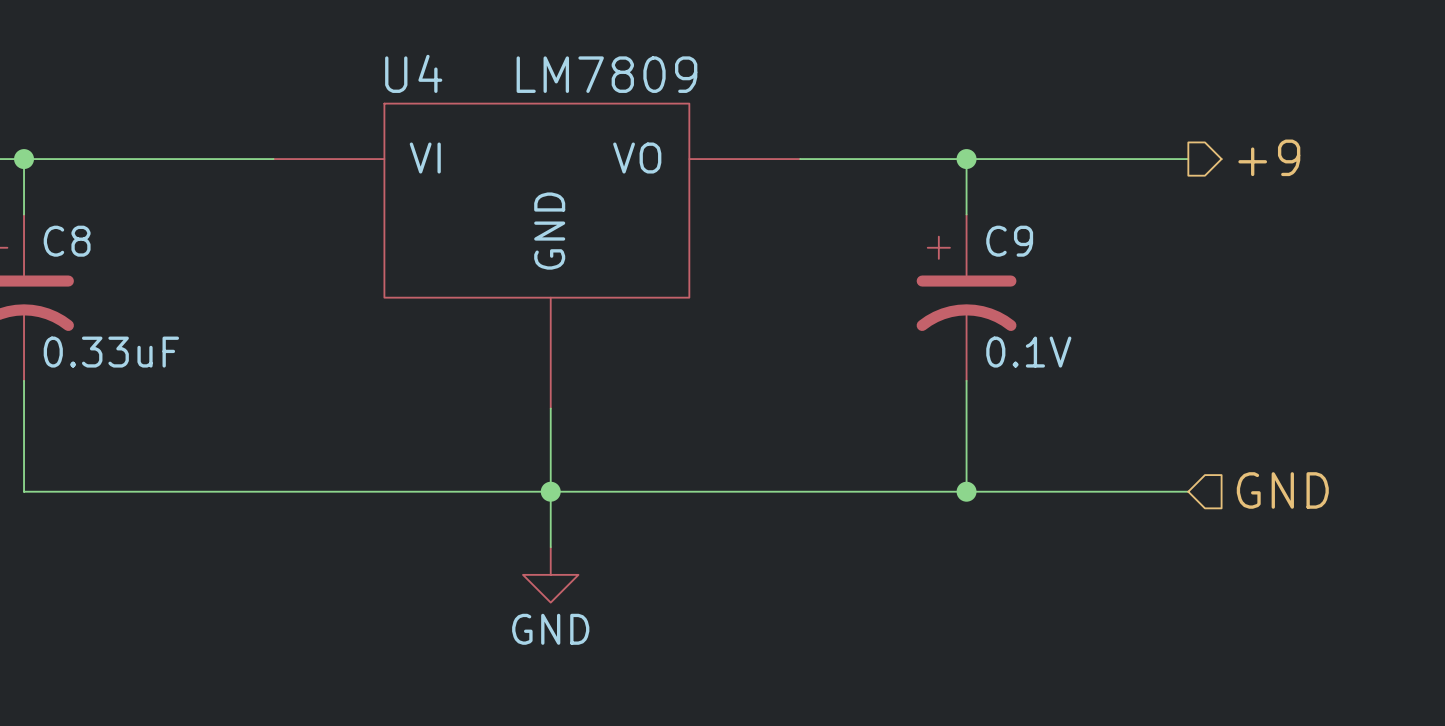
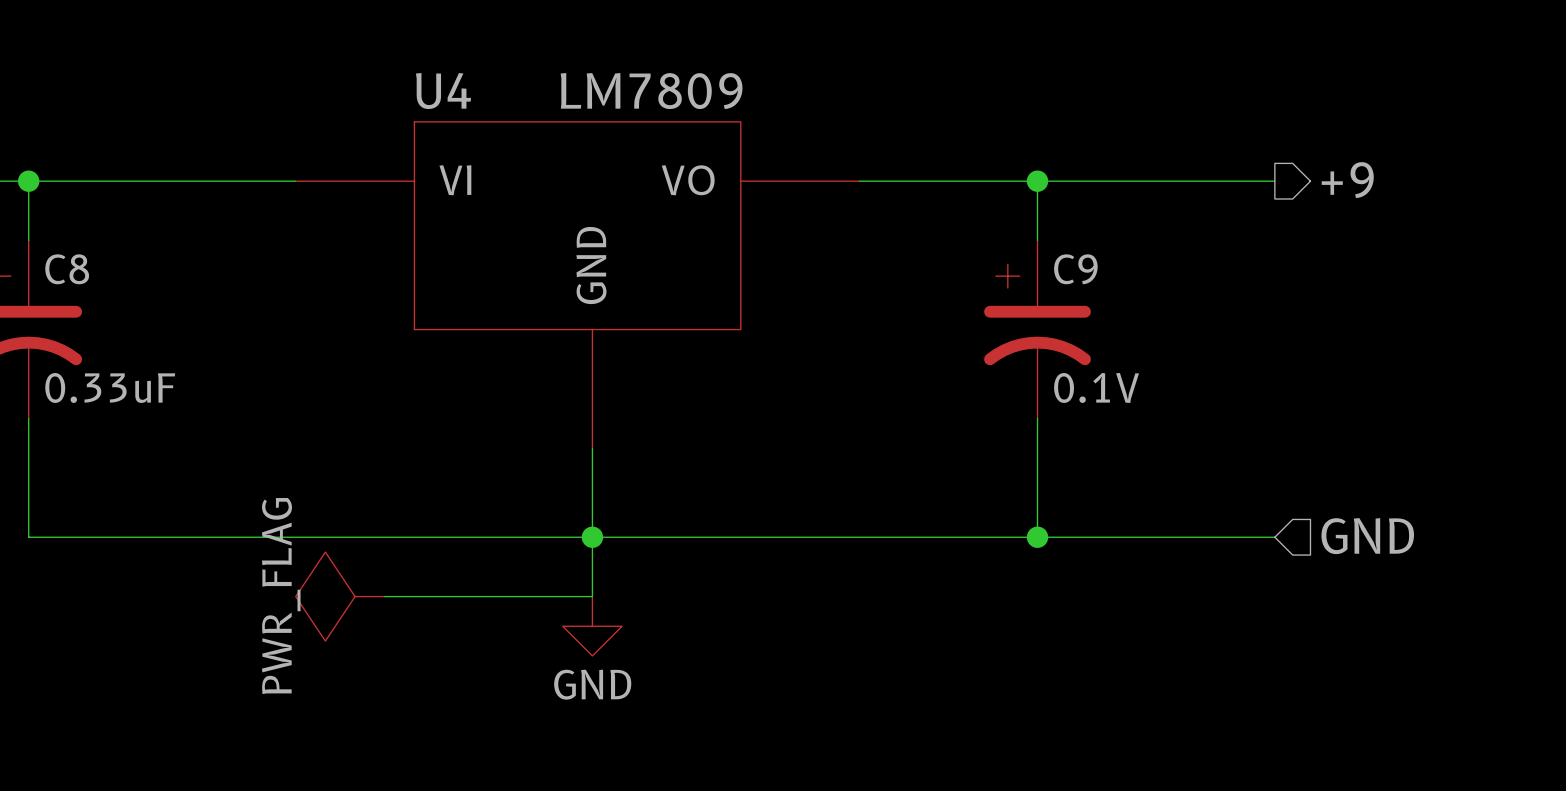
power symbol: none -> PWR_FLAG (340, 596)
wire: none -> (384, 596) (592, 596)

